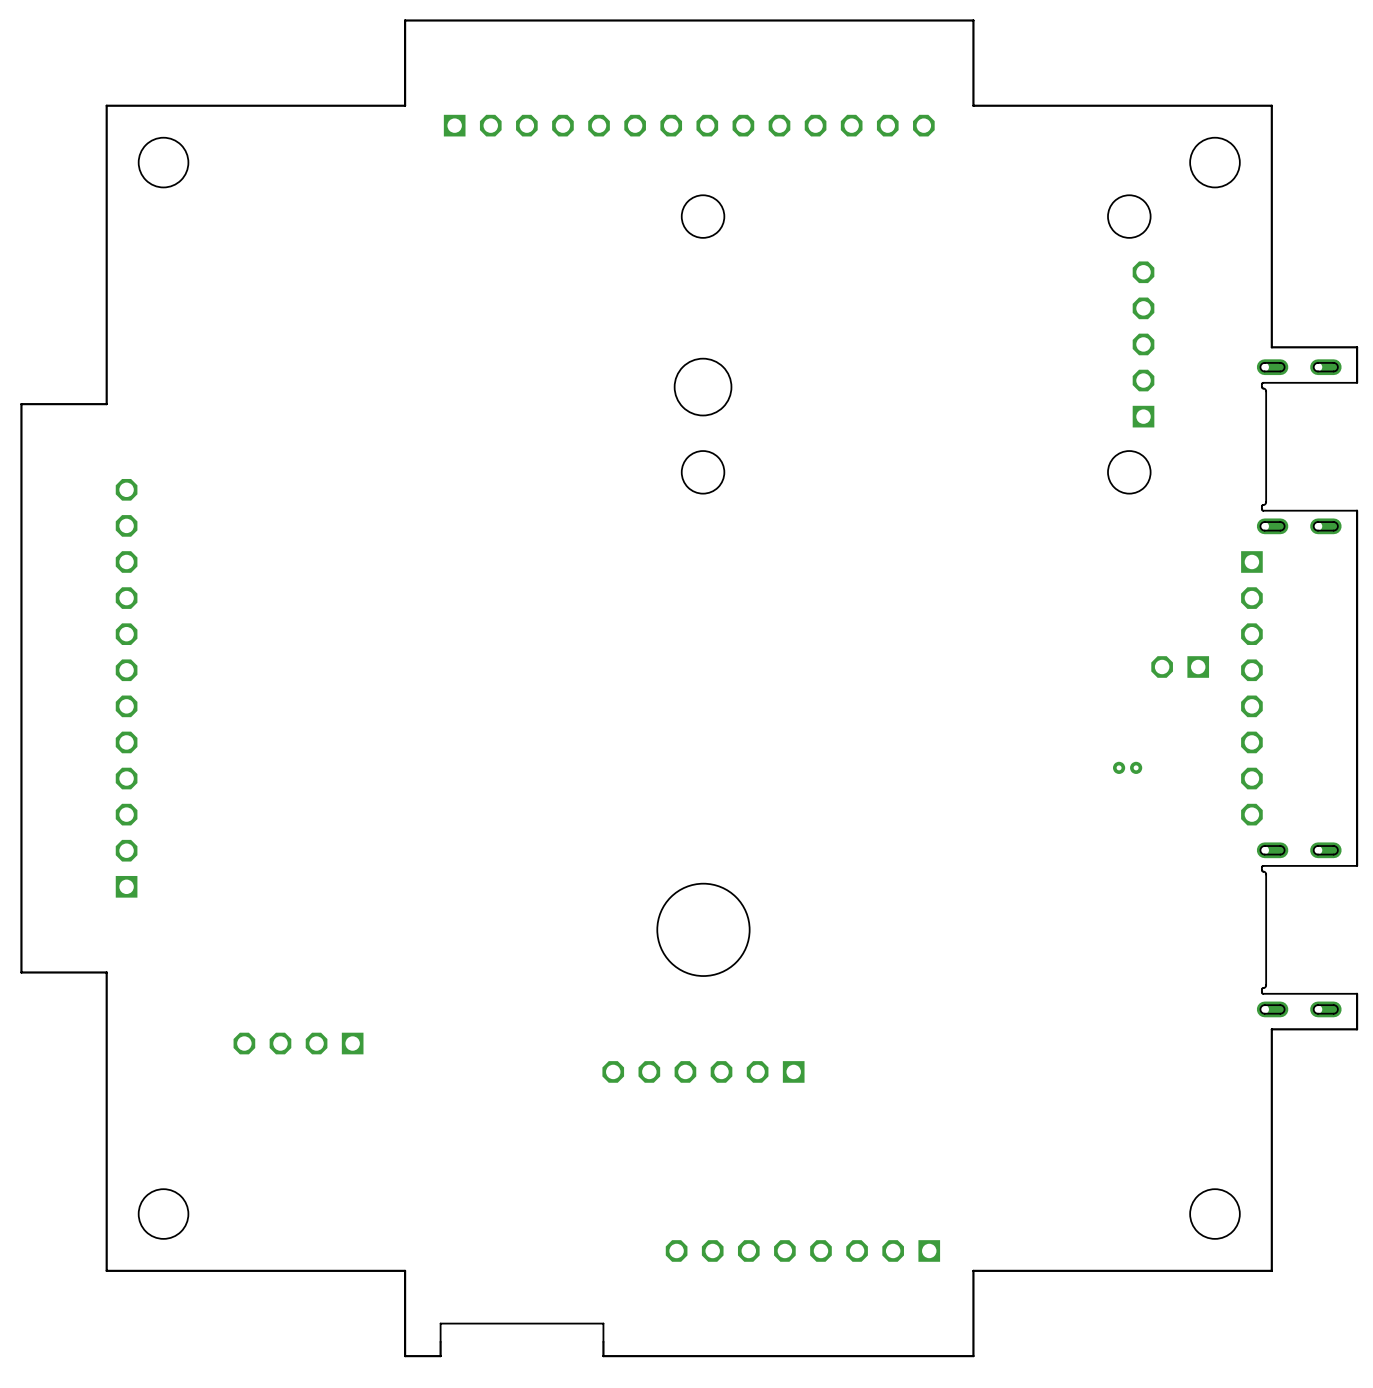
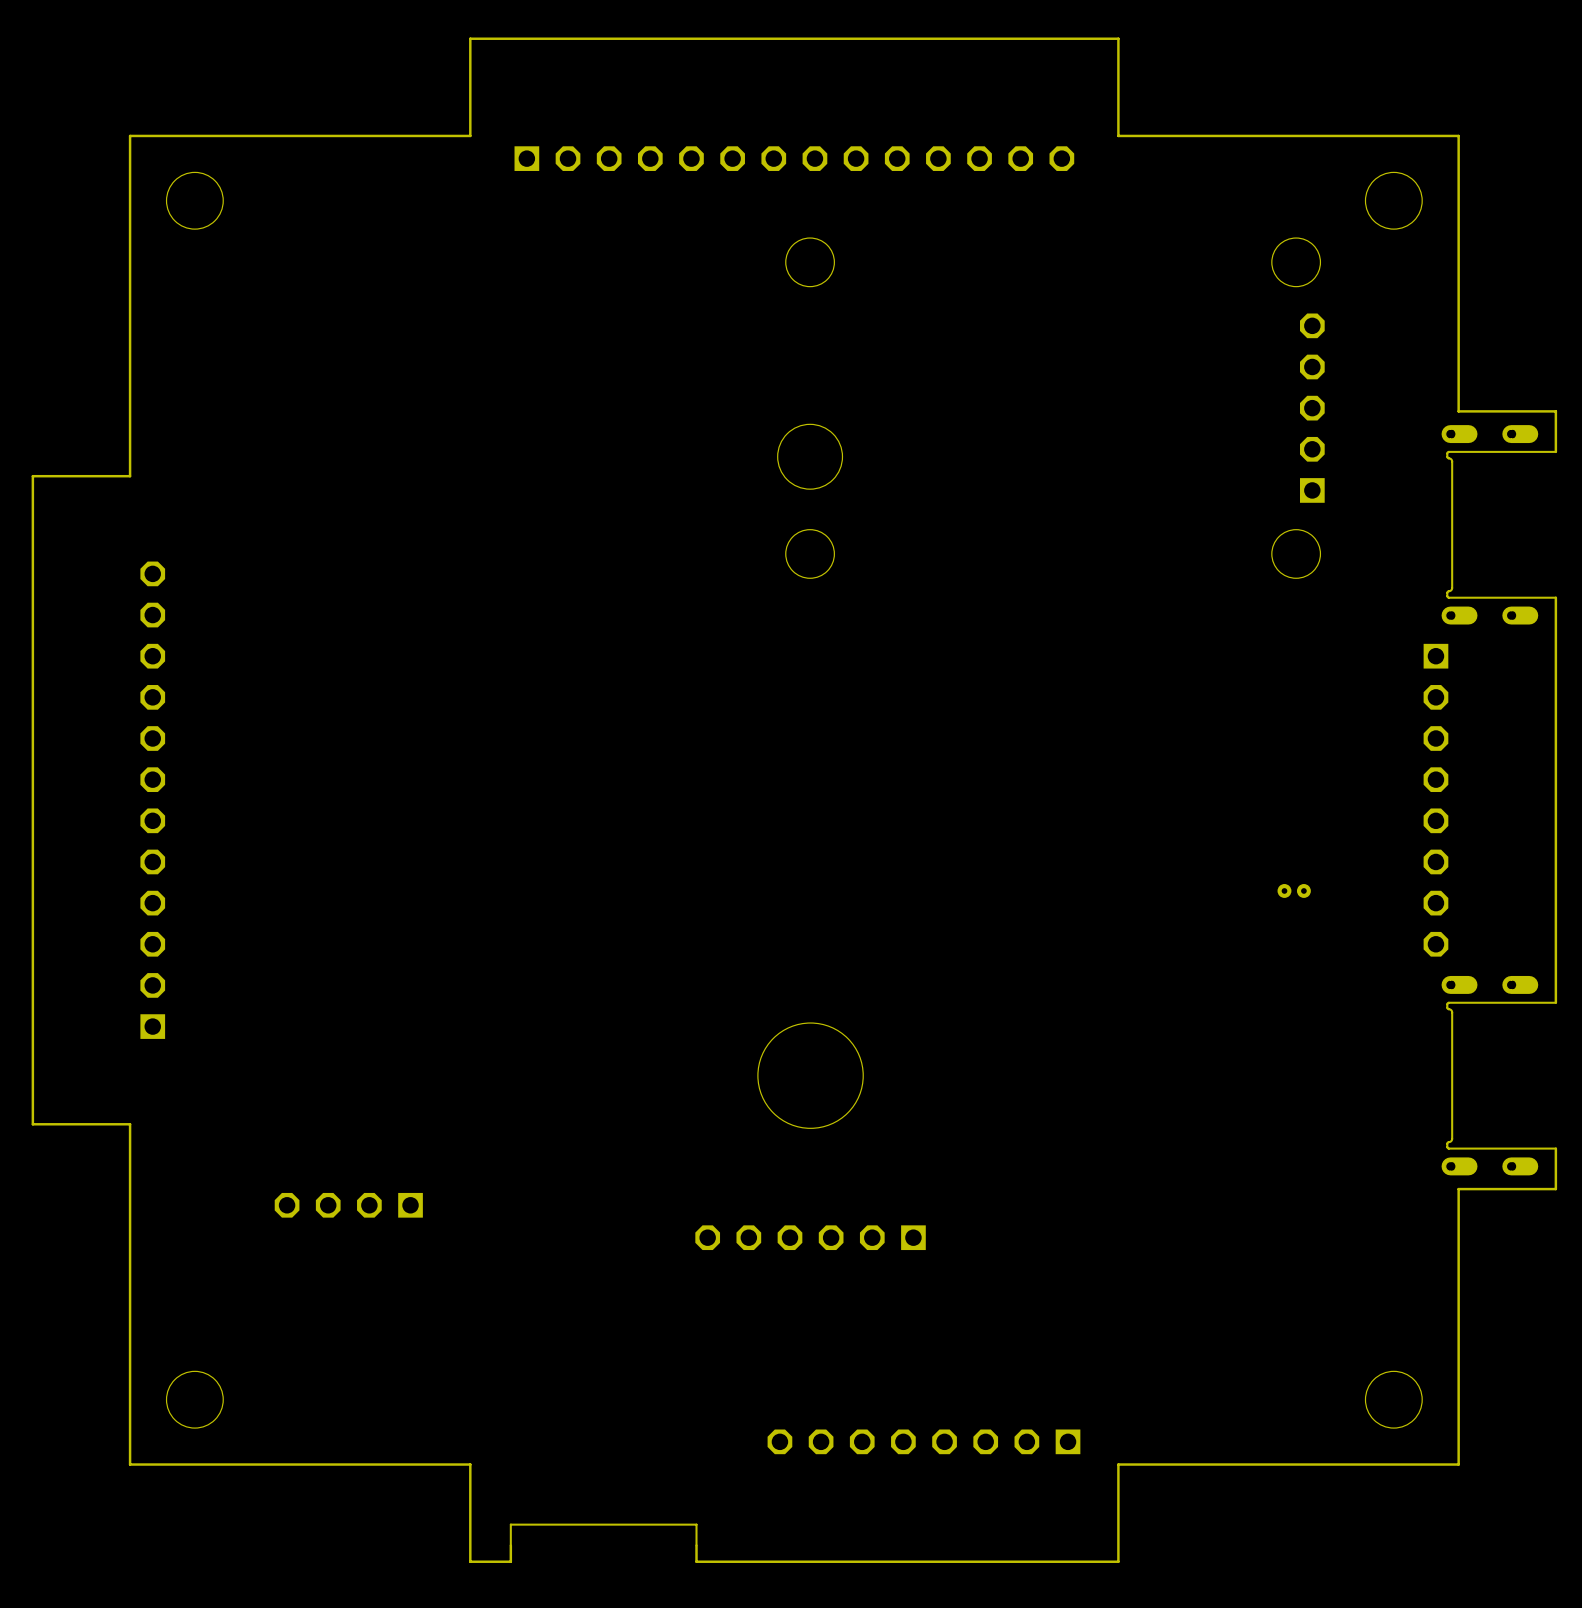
part: (1180, 666) -> none

